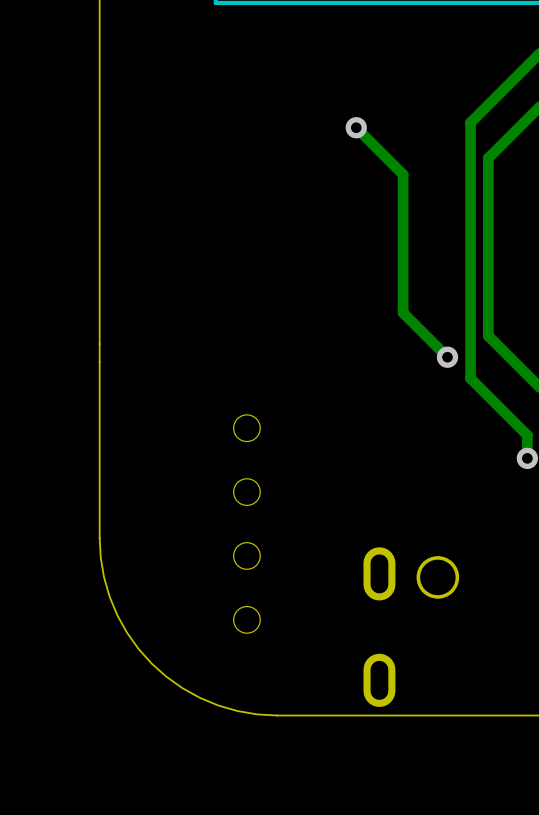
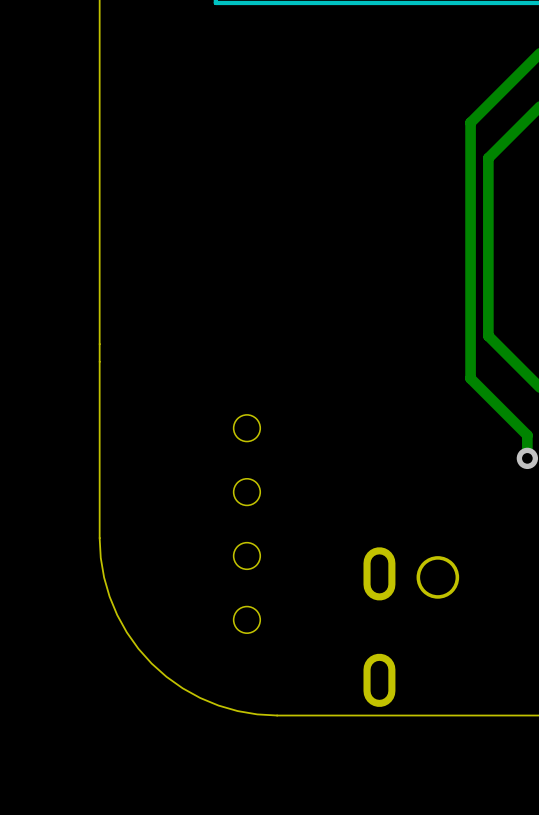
track: (356, 127) (403, 174) (403, 312) (447, 357) -> none
via: (356, 127) -> none
via: (447, 357) -> none

